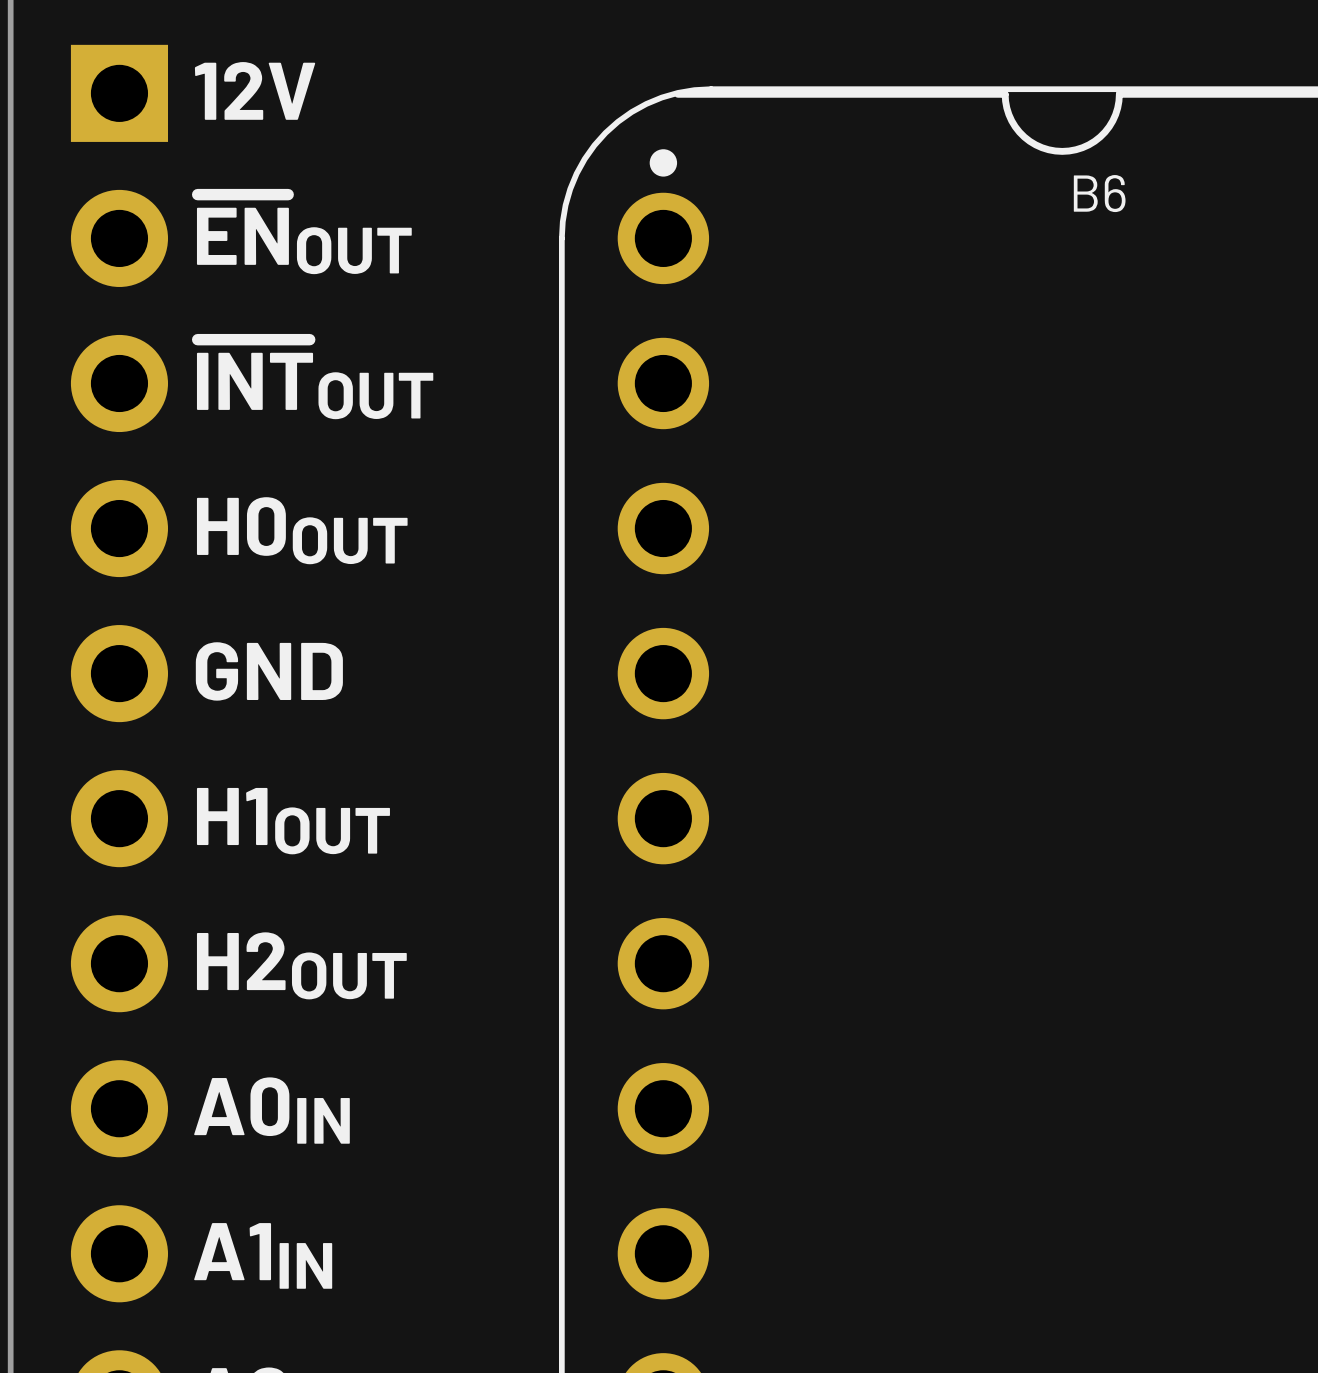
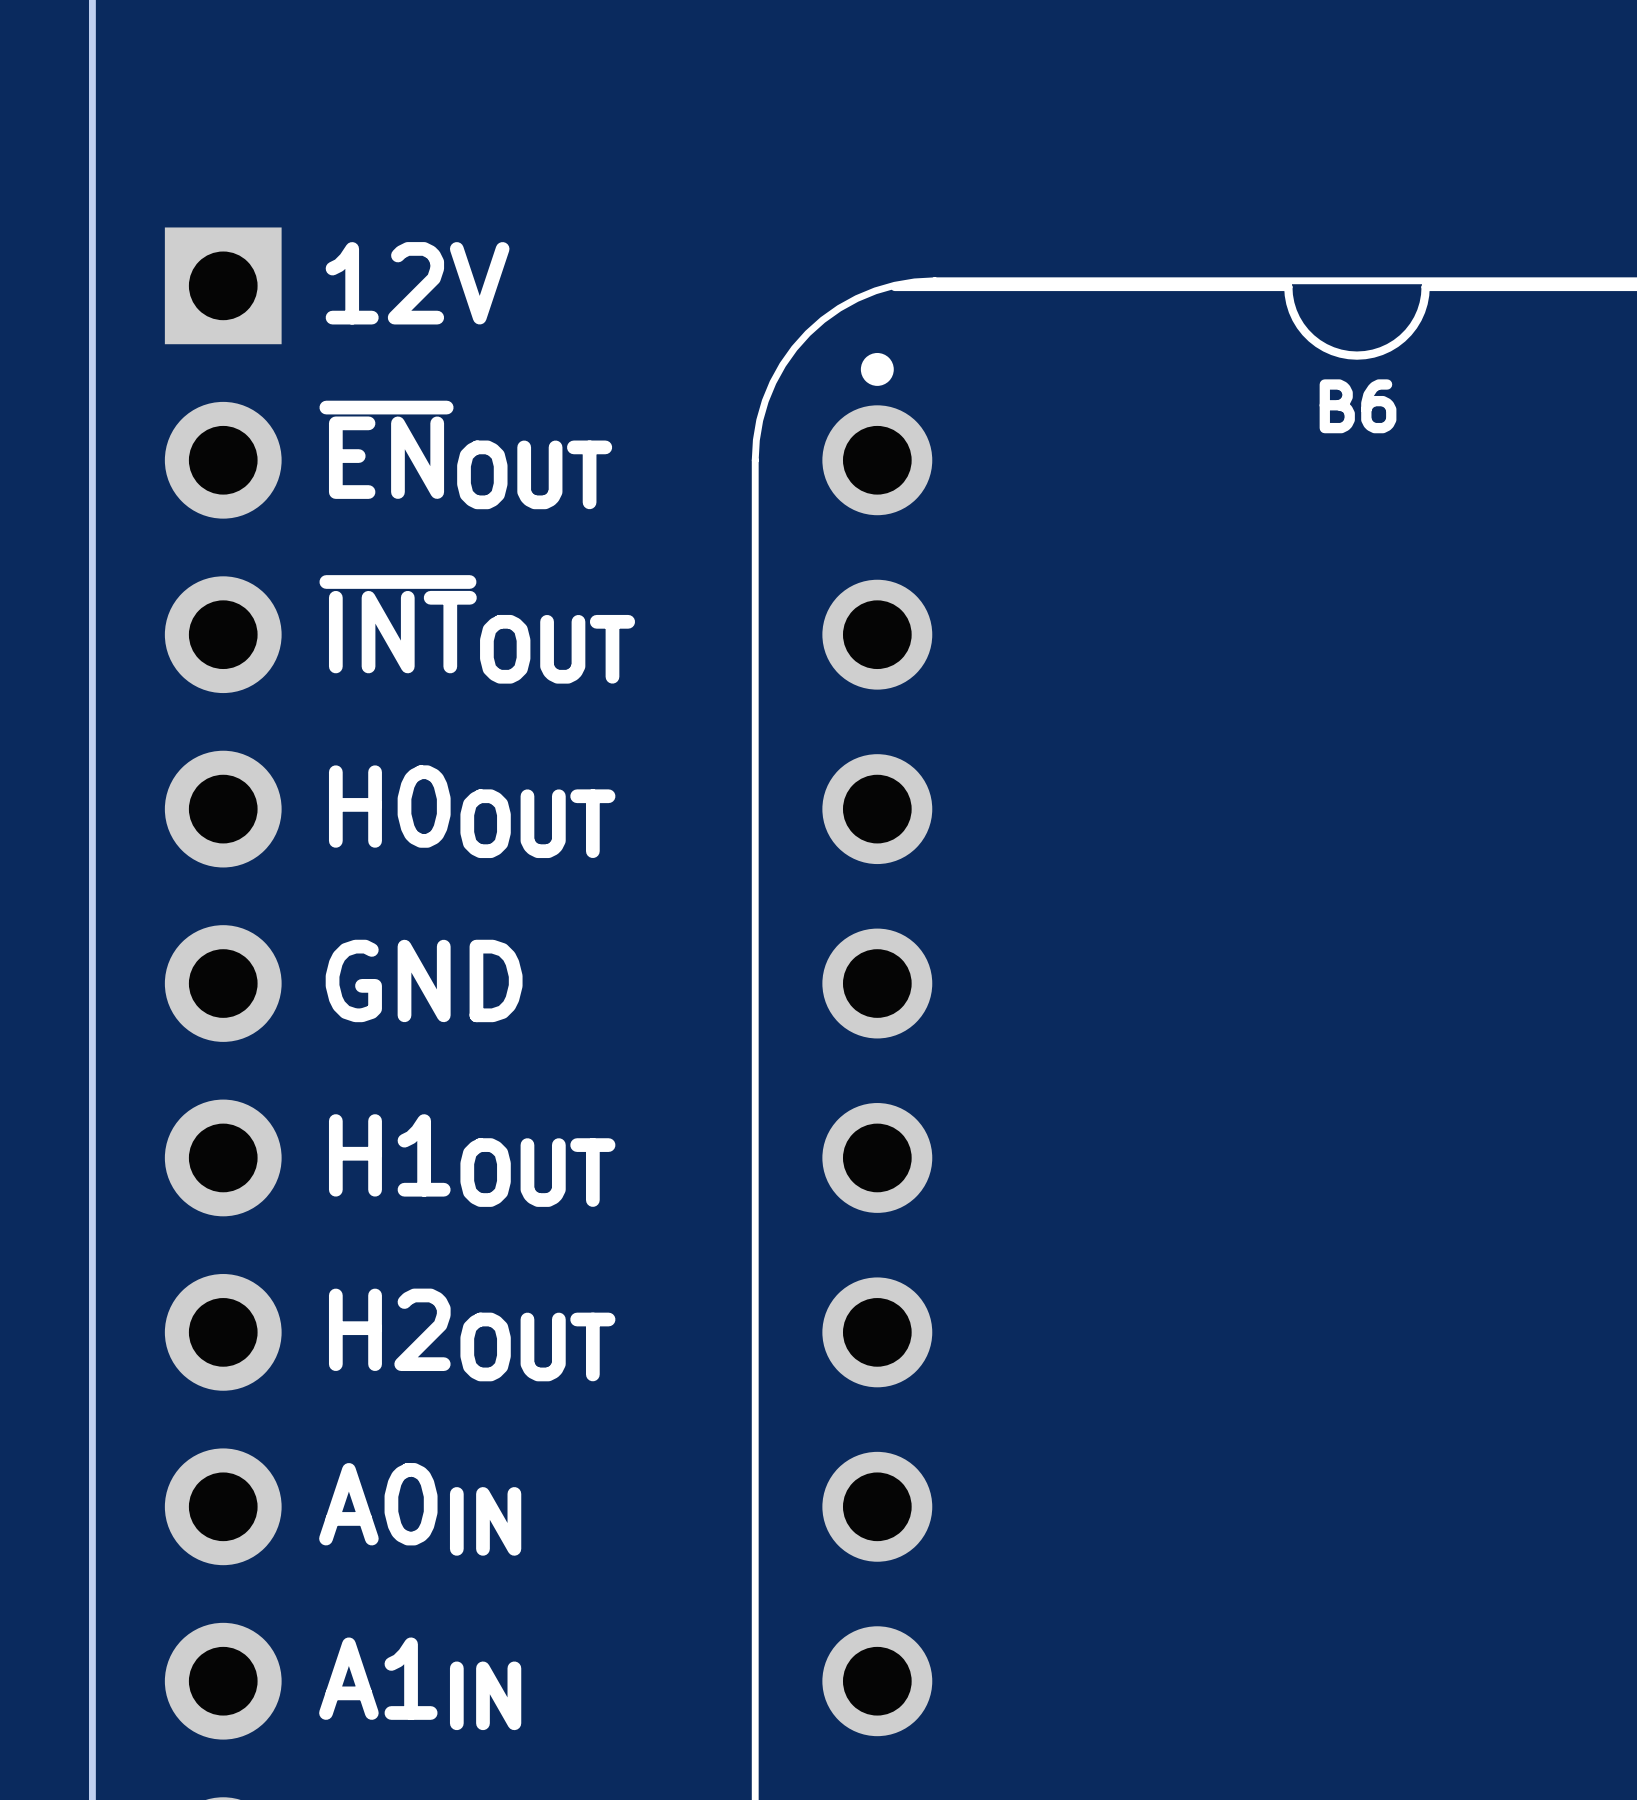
B6 name position: B6 (1099, 193) -> B6 (1358, 406)

